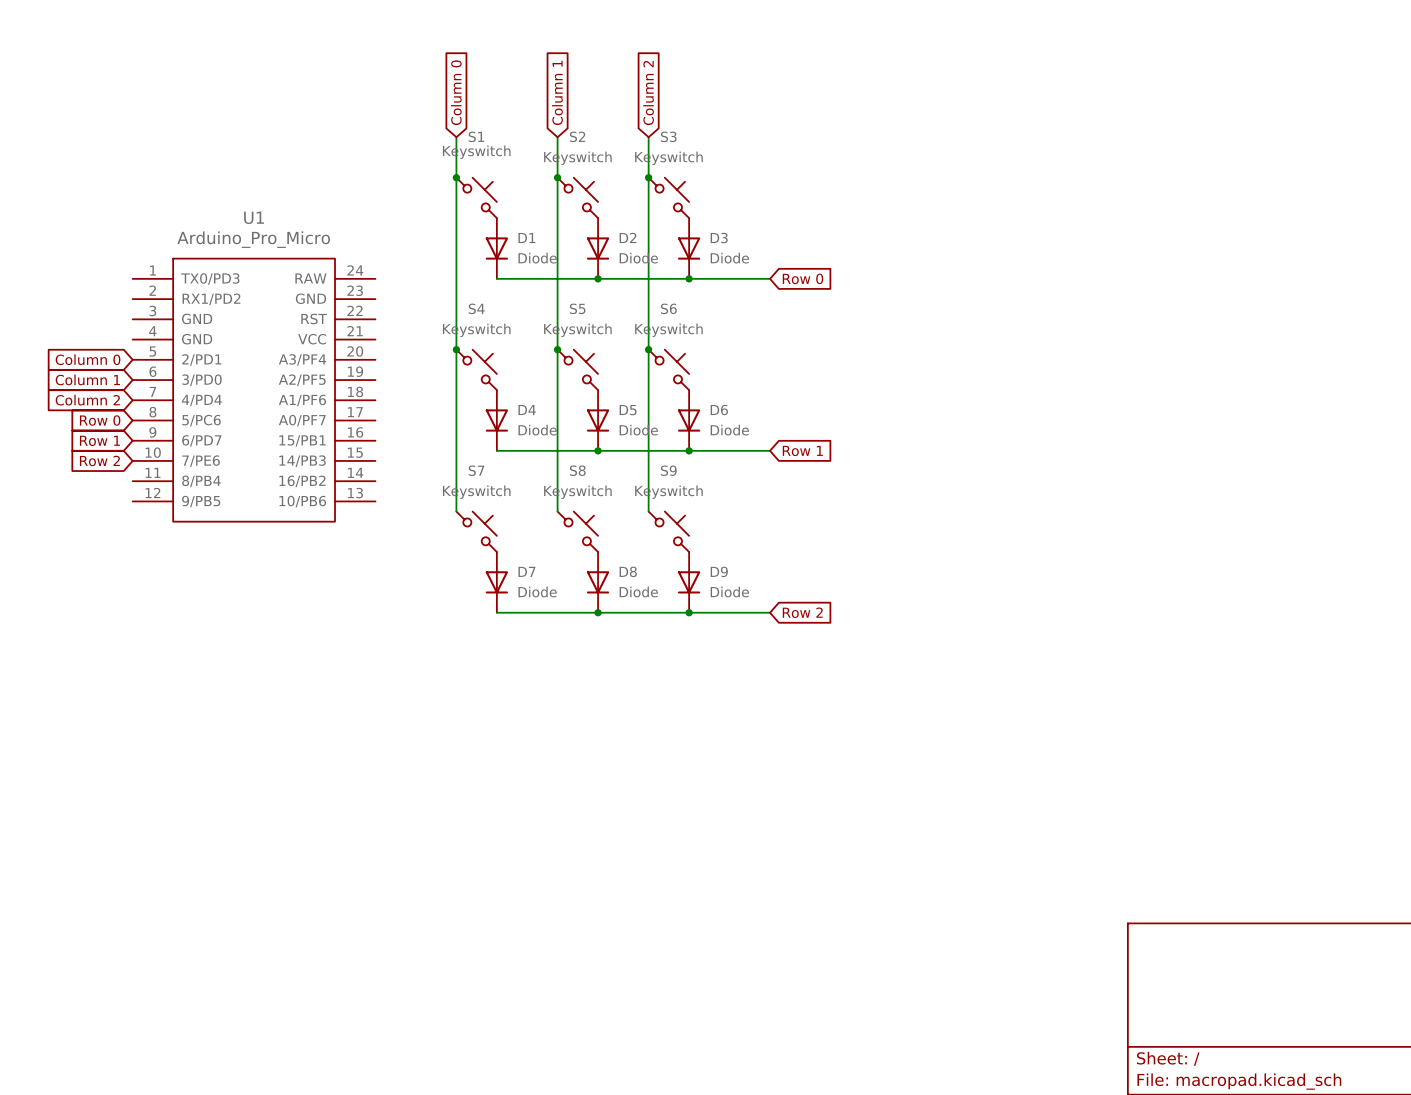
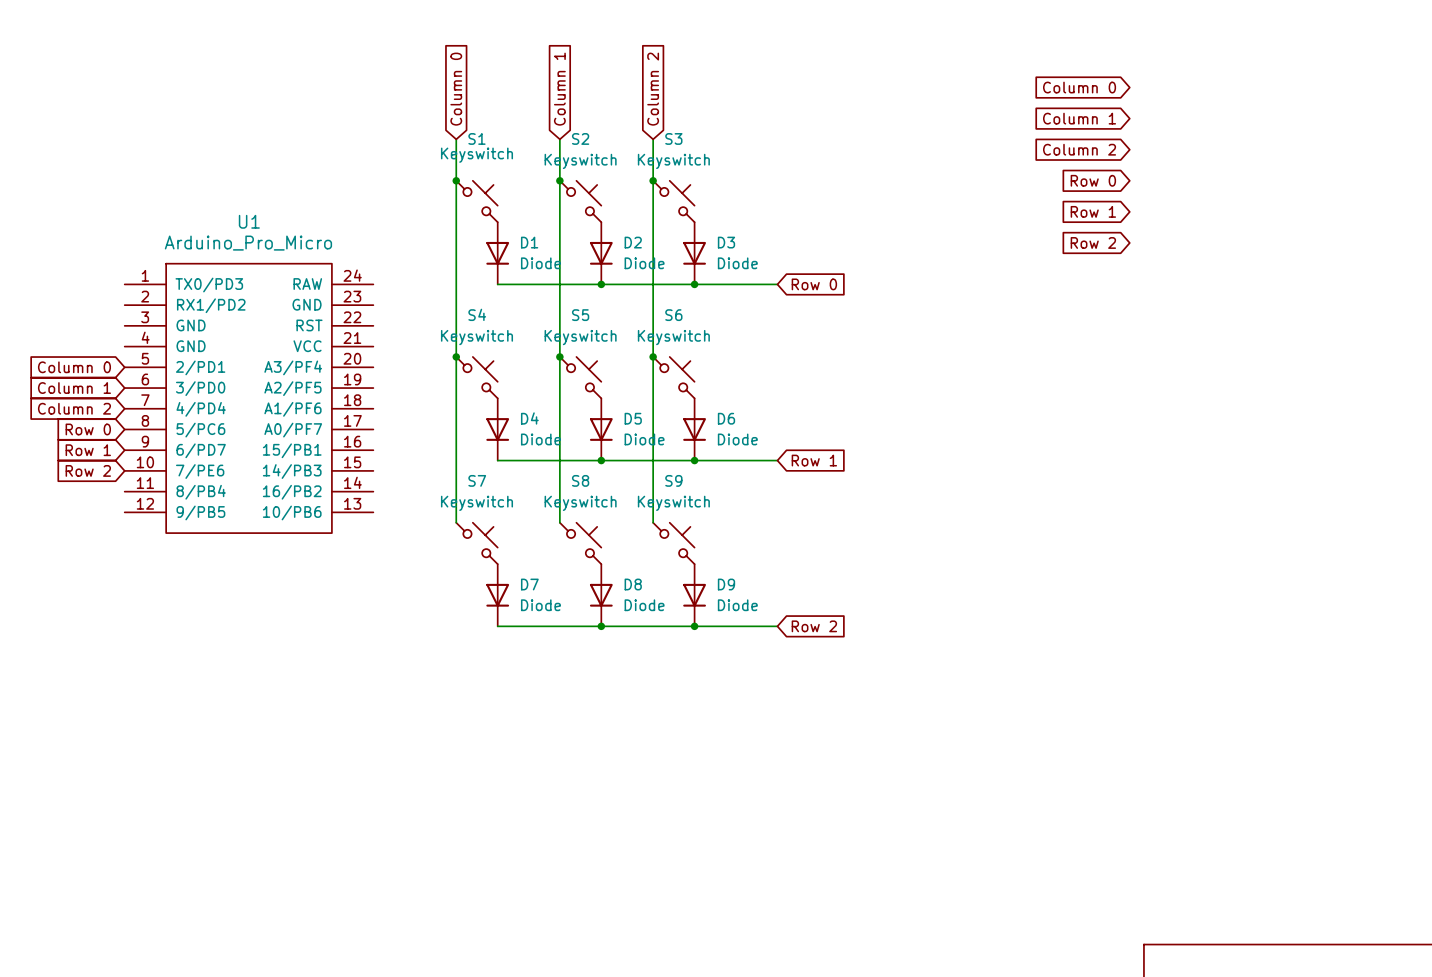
global label: none -> Column 0 (1079, 87)
global label: none -> Column 1 (1079, 118)
global label: none -> Column 2 (1079, 149)
global label: none -> Row 0 (1093, 180)
global label: none -> Row 1 (1093, 211)
global label: none -> Row 2 (1093, 242)

